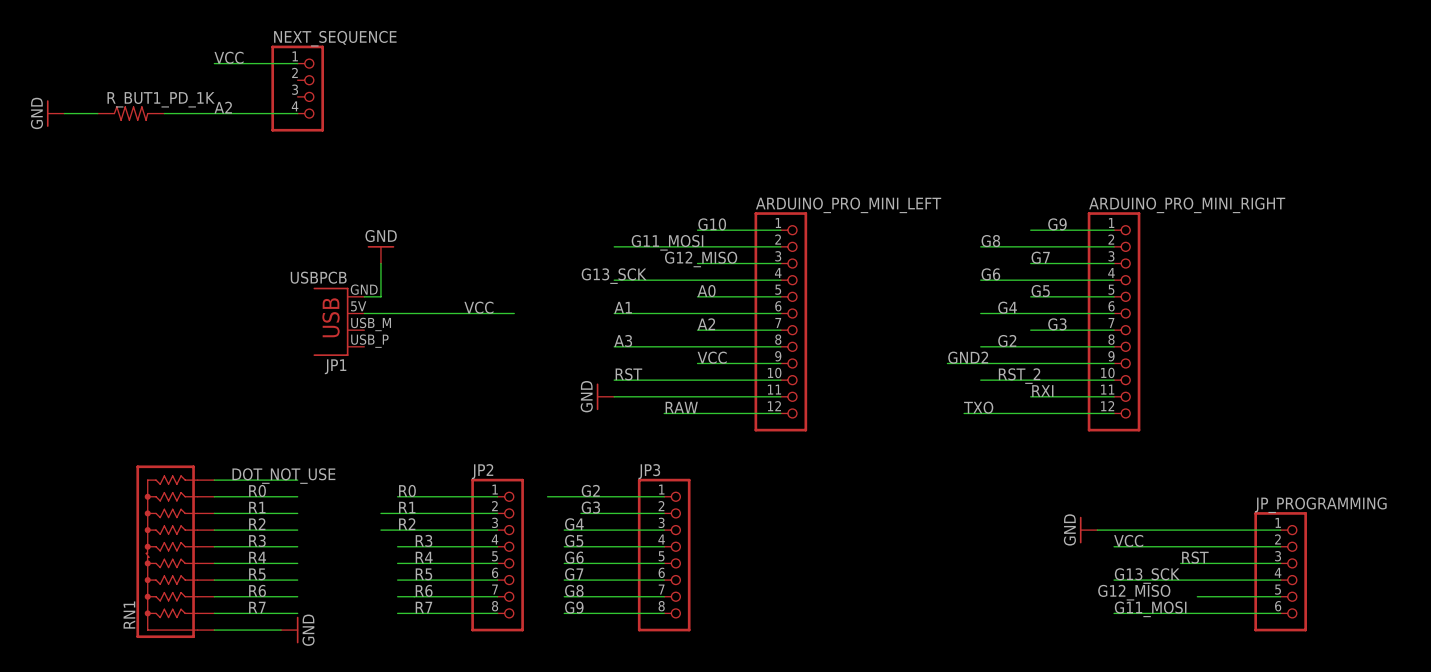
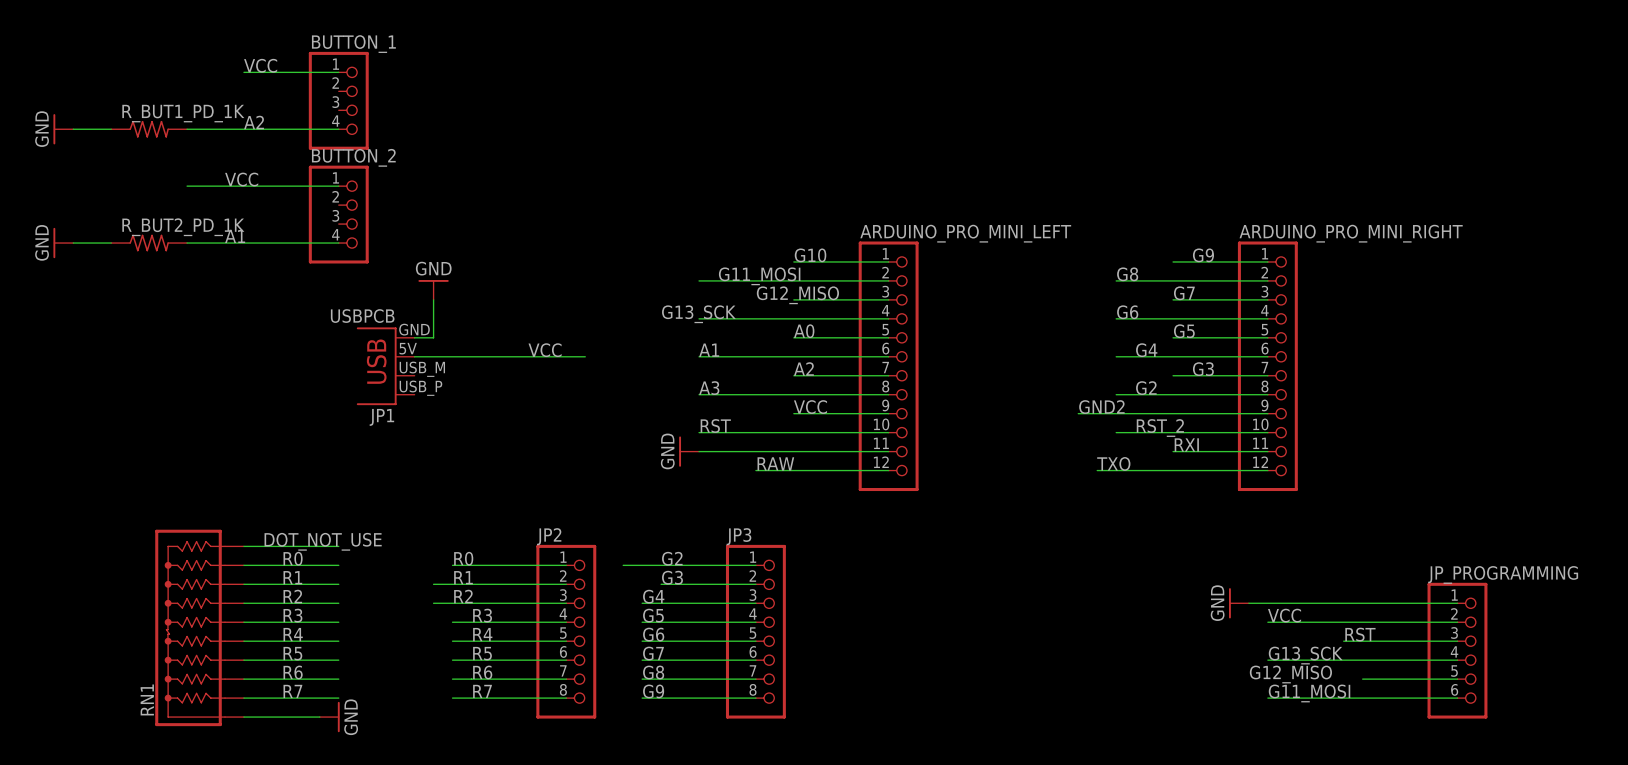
NEXT_SEQUENCE name: NEXT_SEQUENCE (335, 38) -> BUTTON_1 (353, 44)
label: none -> VCC (241, 179)
wire: none -> (187, 186) (338, 186)
BUTTON_2: none -> (338, 214)
label: none -> A1 (235, 236)
power symbol: none -> GND (63, 243)
wire: none -> (73, 243) (111, 243)
R_BUT2_PD_1K: none -> (149, 243)
wire: none -> (187, 243) (338, 243)

